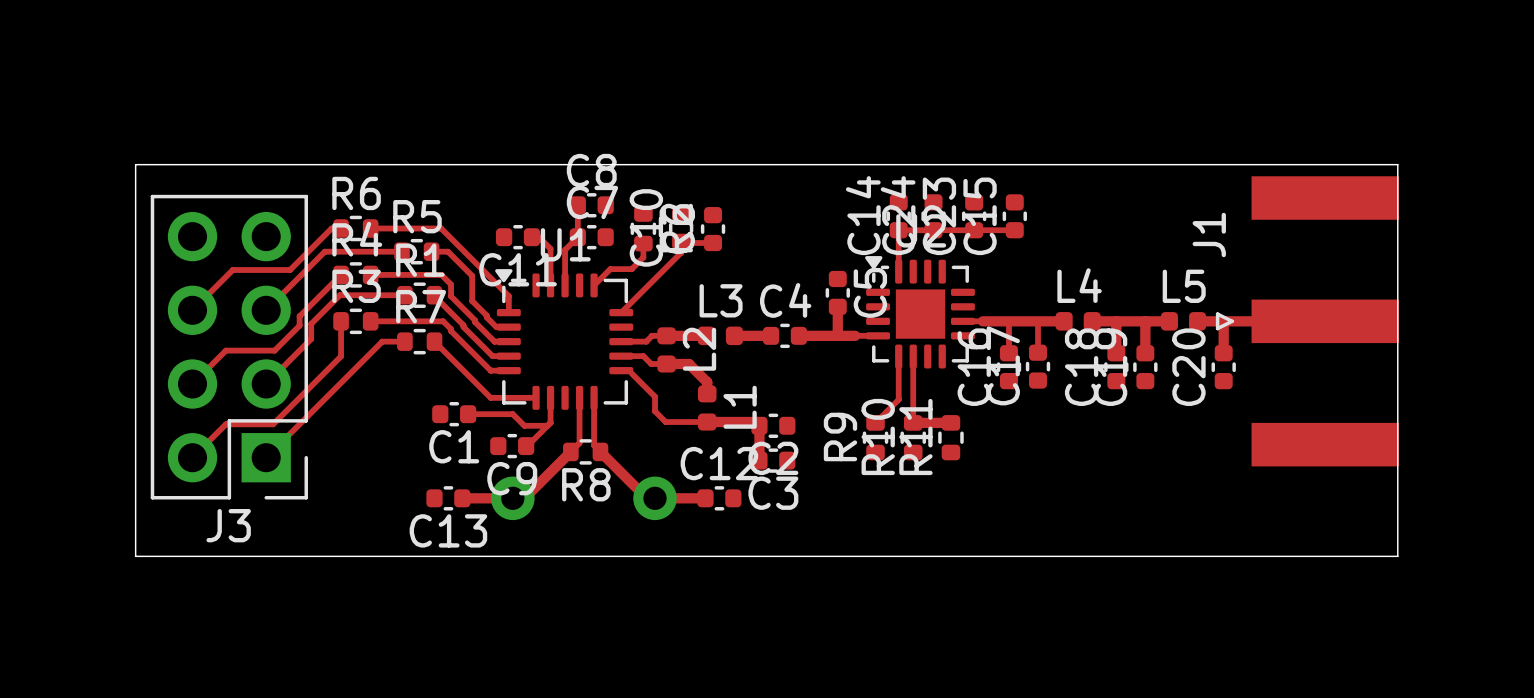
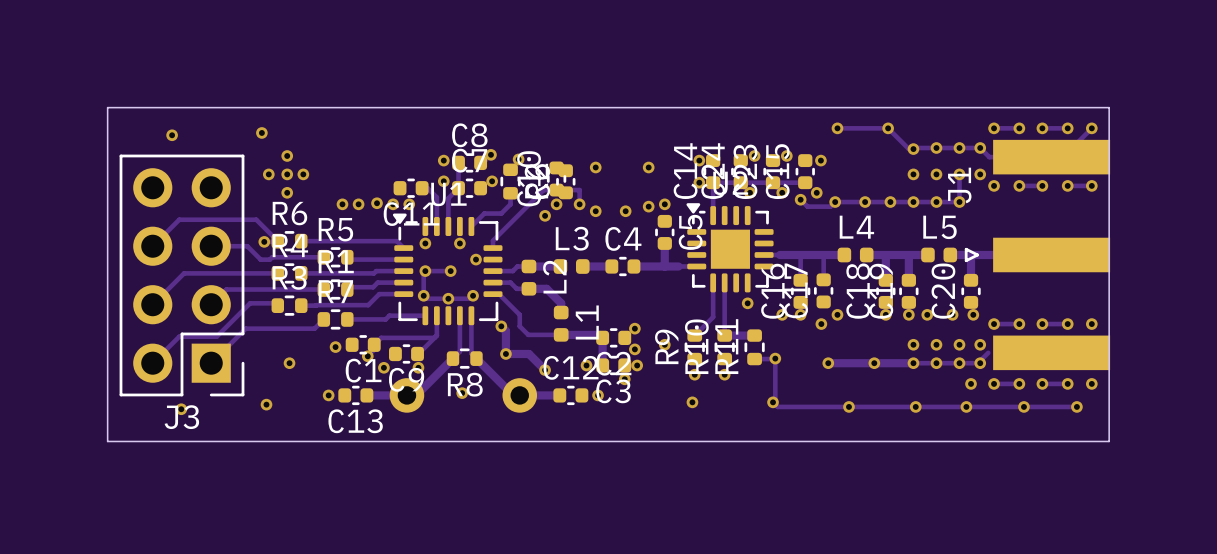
track: none -> (837, 128) (888, 128) (908, 149) (980, 147) (989, 157) (1063, 157) (1091, 128)
via: none -> (837, 128)
via: none -> (888, 128)
track: none -> (994, 128) (1019, 128)
via: none -> (994, 128)
via: none -> (1019, 128)
track: none -> (1042, 128) (1067, 128)
via: none -> (1042, 128)
via: none -> (1067, 128)
via: none -> (1091, 128)
board edge: (135, 164) (1397, 164) -> (107, 130) (107, 107) (1109, 107) (1109, 130)
via: none -> (261, 132)
via: none -> (172, 135)
via: none -> (936, 147)
via: none -> (959, 147)
via: none -> (980, 147)
via: none -> (913, 149)
via: none -> (490, 154)
via: none -> (287, 155)
via: none -> (754, 155)
via: none -> (786, 155)
via: none -> (518, 159)
via: none -> (443, 160)
via: none -> (699, 160)
via: none -> (820, 160)
via: none -> (595, 167)
via: none -> (648, 167)
via: none -> (268, 174)
via: none -> (287, 174)
via: none -> (303, 174)
via: none -> (913, 174)
via: none -> (936, 174)
track: none -> (959, 174) (959, 202) (835, 202) (830, 206) (807, 206) (800, 199)
via: none -> (959, 174)
via: none -> (980, 174)
C10 position: (681, 227) -> (556, 179)
track: (341, 228) (331, 228) (290, 270) (232, 270) (225, 276) -> (264, 241) (277, 241) (256, 219) (179, 219)
R6 position: (355, 228) -> (289, 241)
track: (370, 228) (441, 228) (508, 296) (508, 312) -> (301, 241) (396, 241) (403, 248)
via: none -> (443, 181)
via: none -> (492, 181)
via: none -> (699, 182)
via: none -> (994, 185)
track: none -> (1019, 185) (1042, 185)
via: none -> (1019, 185)
via: none -> (1042, 185)
track: none -> (1067, 185) (1091, 185)
via: none -> (1067, 185)
via: none -> (1091, 185)
via: none -> (287, 192)
track: (713, 243) (681, 241) (681, 252) (621, 312) -> (579, 204) (579, 190) (543, 190) (492, 240) (492, 248)
via: none -> (749, 192)
via: none -> (782, 192)
via: none -> (816, 192)
track: (402, 251) (324, 251) (266, 310) -> (323, 257) (272, 257) (269, 259) (260, 259) (247, 246) (211, 246)
R5 position: (416, 251) -> (335, 257)
track: (431, 251) (448, 251) (472, 275) (472, 301) (496, 327) -> (347, 257) (349, 259) (393, 259)
via: none -> (800, 199)
via: none -> (835, 202)
via: none -> (865, 202)
via: none -> (890, 202)
via: none -> (913, 202)
via: none -> (936, 202)
via: none -> (959, 202)
via: none -> (377, 203)
via: none -> (342, 204)
via: none -> (358, 204)
via: none -> (393, 204)
via: none -> (409, 204)
via: none -> (556, 204)
via: none -> (579, 204)
via: none -> (664, 204)
via: none -> (648, 206)
via: none -> (595, 211)
via: none -> (625, 211)
via: none -> (545, 215)
track: (341, 274) (299, 316) (299, 325) (274, 350) (225, 350) -> (277, 273) (184, 273) (179, 278)
R4 position: (355, 274) -> (289, 273)
track: (370, 274) (441, 274) (451, 284) (451, 296) (494, 341) -> (301, 273) (373, 273) (376, 271) (392, 271)
track: (404, 295) (339, 295) (311, 323) (311, 339) (285, 364) -> (323, 289) (226, 289)
R1 position: (419, 295) -> (335, 289)
track: (434, 295) (492, 356) -> (347, 289) (349, 287) (373, 287) (377, 282) (390, 282)
via: none -> (264, 241)
via: none -> (425, 243)
via: none -> (459, 243)
track: (341, 321) (341, 356) (315, 382) -> (277, 305) (275, 303) (250, 303)
R3 position: (355, 321) -> (289, 305)
track: (370, 321) (443, 321) (490, 370) -> (301, 305) (368, 305) (379, 294) (389, 294)
via: none -> (476, 259)
track: (404, 341) (382, 341) (309, 414) -> (323, 319) (314, 328) (245, 328)
R7 position: (419, 341) -> (335, 319)
track: (434, 341) (490, 397) -> (347, 319) (385, 319) (389, 315)
via: none -> (425, 271)
track: none -> (450, 271) (425, 271) (423, 272) (423, 295) (426, 298) (470, 298) (473, 295)
via: none -> (450, 271)
via: none -> (423, 295)
via: none -> (473, 295)
via: none -> (448, 298)
via: none -> (747, 303)
via: none -> (782, 314)
via: none -> (800, 314)
via: none -> (837, 314)
via: none -> (885, 314)
via: none -> (908, 314)
via: none -> (927, 314)
via: none -> (952, 314)
via: none -> (973, 314)
via: none -> (821, 324)
track: none -> (994, 324) (1019, 324)
via: none -> (994, 324)
via: none -> (1019, 324)
track: none -> (1042, 324) (1067, 324)
via: none -> (1042, 324)
via: none -> (1067, 324)
via: none -> (1091, 324)
track: none -> (501, 326) (505, 330) (505, 353) (528, 353) (545, 370)
via: none -> (501, 326)
C1 position: (454, 414) -> (363, 344)
track: (468, 414) (512, 414) (524, 425) -> (367, 356) (374, 349) (374, 344) (381, 337) (416, 337)
via: none -> (634, 328)
via: none -> (664, 344)
via: none -> (913, 344)
via: none -> (936, 344)
via: none -> (959, 344)
via: none -> (980, 344)
via: none -> (335, 347)
via: none -> (634, 349)
track: none -> (988, 352) (980, 363) (828, 363)
via: none -> (505, 353)
via: none -> (367, 356)
via: none -> (775, 358)
track: none -> (754, 359) (775, 358) (775, 400) (773, 402) (777, 406) (1076, 406)
via: none -> (289, 363)
via: none -> (828, 363)
via: none -> (874, 363)
via: none -> (913, 363)
via: none -> (936, 363)
via: none -> (959, 363)
via: none -> (980, 363)
via: none -> (586, 365)
via: none -> (637, 365)
via: none -> (383, 367)
via: none -> (418, 367)
via: none -> (545, 370)
via: none -> (694, 374)
via: none -> (724, 374)
via: none -> (624, 379)
via: none -> (971, 383)
track: none -> (994, 383) (1019, 383)
via: none -> (994, 383)
via: none -> (1019, 383)
track: none -> (1042, 383) (1067, 383)
via: none -> (1042, 383)
via: none -> (1067, 383)
via: none -> (1091, 383)
via: none -> (462, 393)
via: none -> (328, 395)
via: none -> (598, 395)
via: none -> (692, 402)
via: none -> (773, 402)
via: none -> (266, 404)
via: none -> (848, 406)
via: none -> (915, 406)
via: none -> (966, 406)
via: none -> (1023, 406)
via: none -> (1076, 406)
via: none -> (181, 409)

